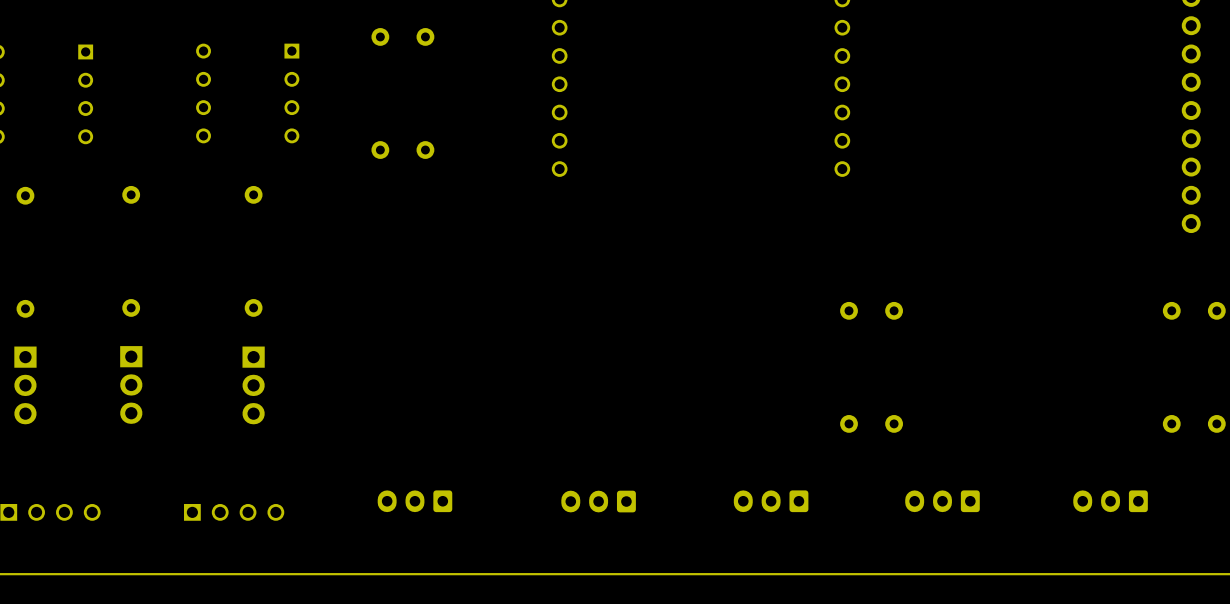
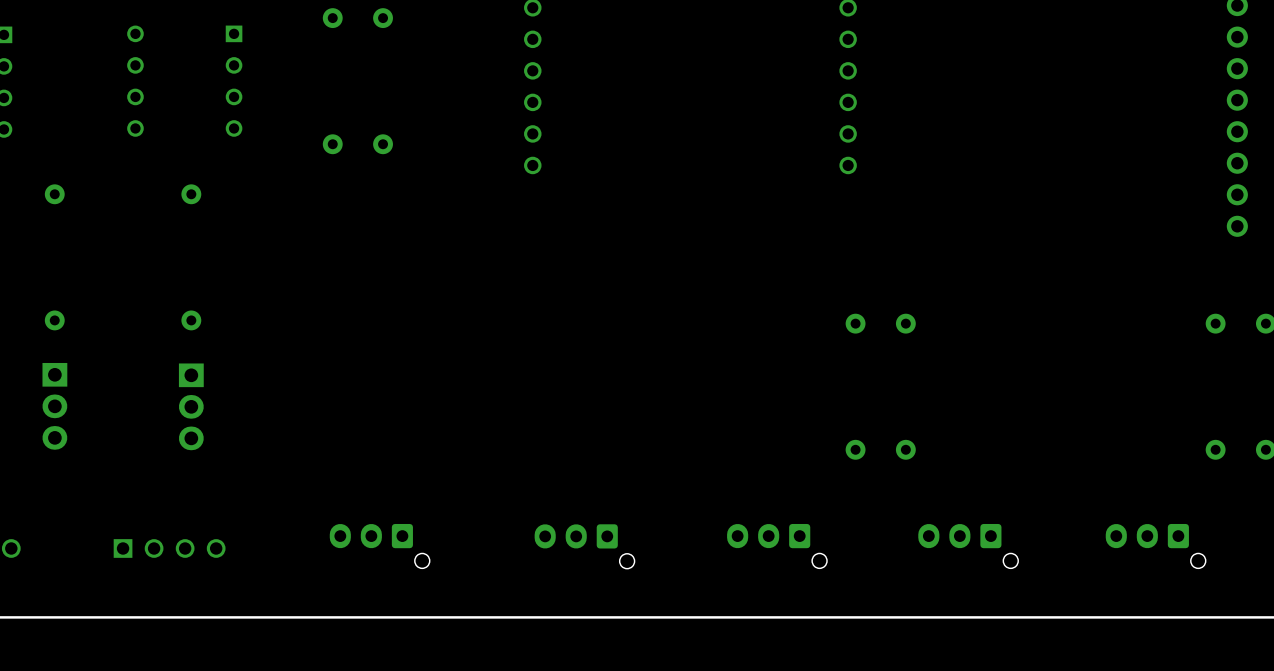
part: none -> (379, 546)
part: none -> (584, 546)
part: none -> (777, 546)
part: none -> (968, 546)
part: none -> (1155, 546)

